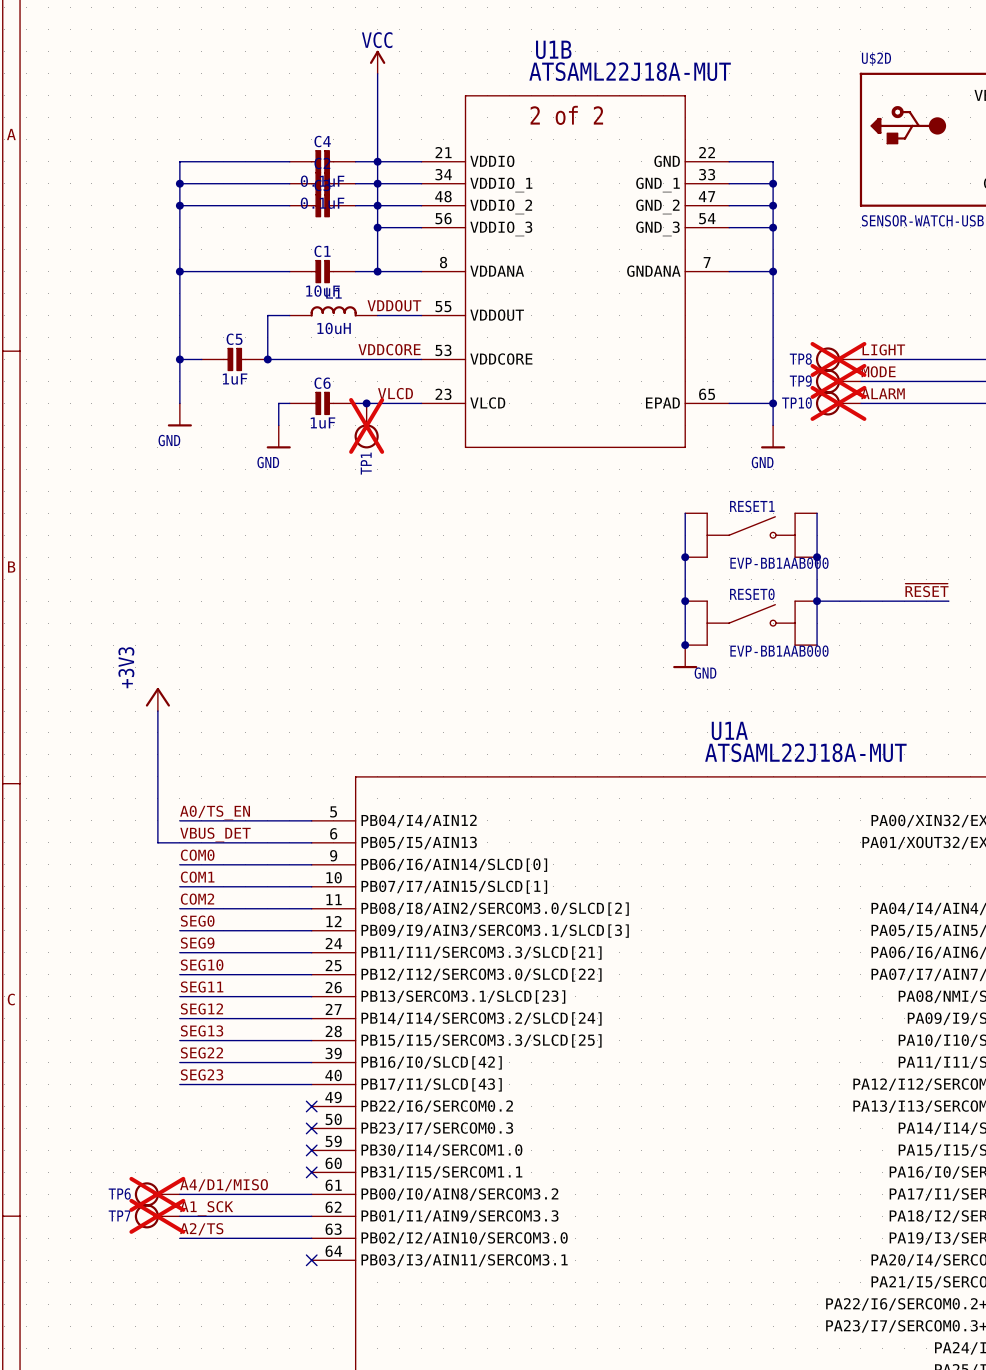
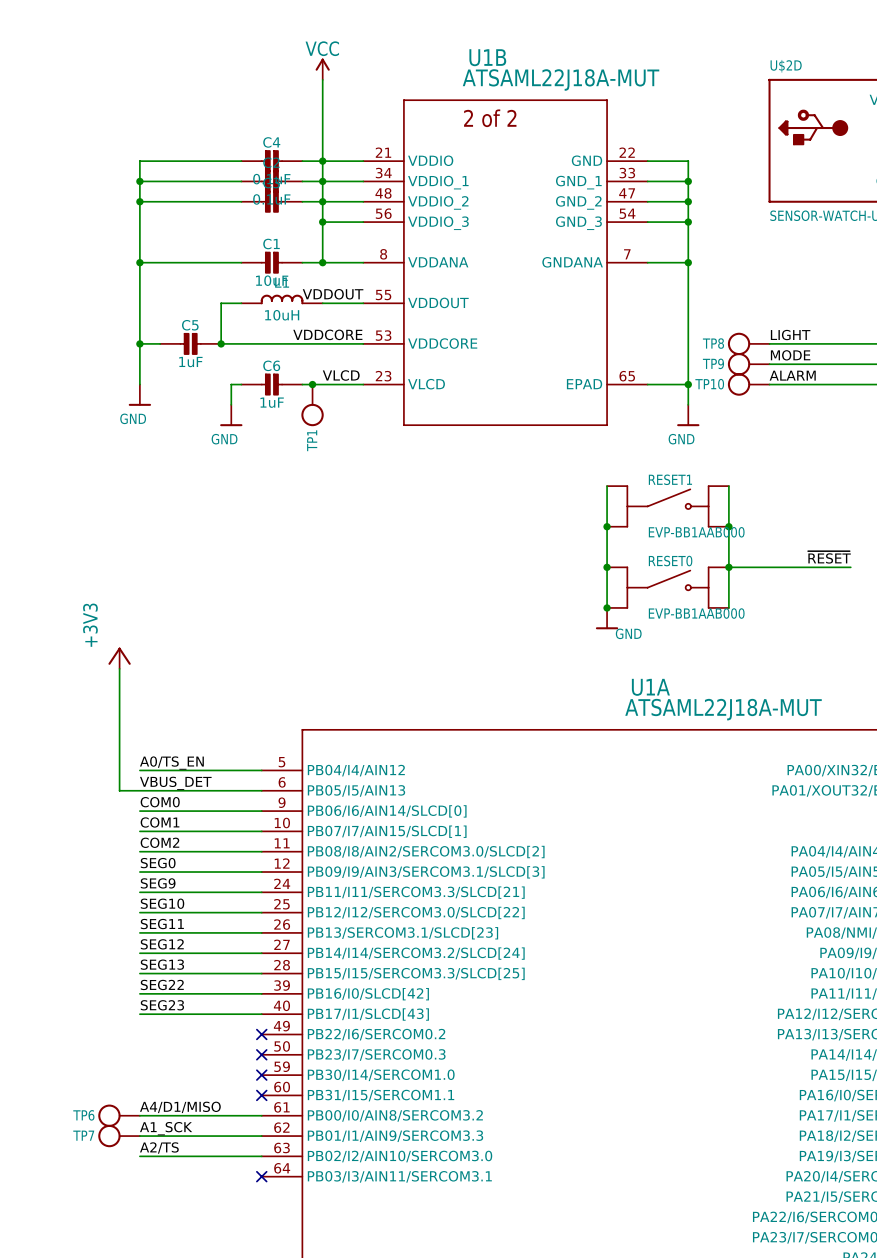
TP8 do-not-place cross: (838, 359) -> none
TP9 do-not-place cross: (838, 381) -> none
TP10 do-not-place cross: (838, 403) -> none
TP1 do-not-place cross: (366, 425) -> none
TP6 do-not-place cross: (157, 1194) -> none
TP7 do-not-place cross: (157, 1216) -> none

